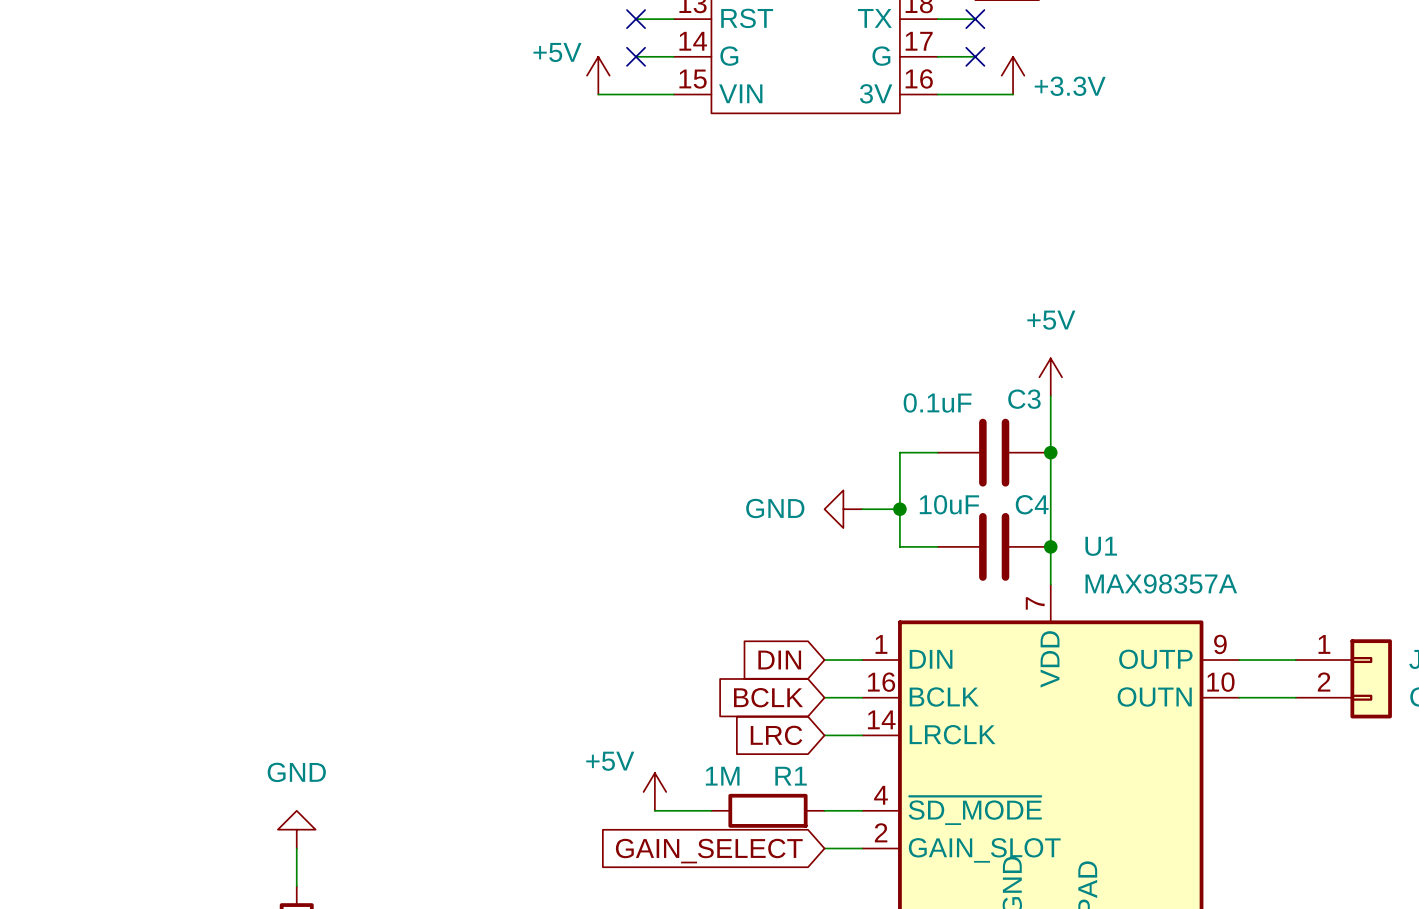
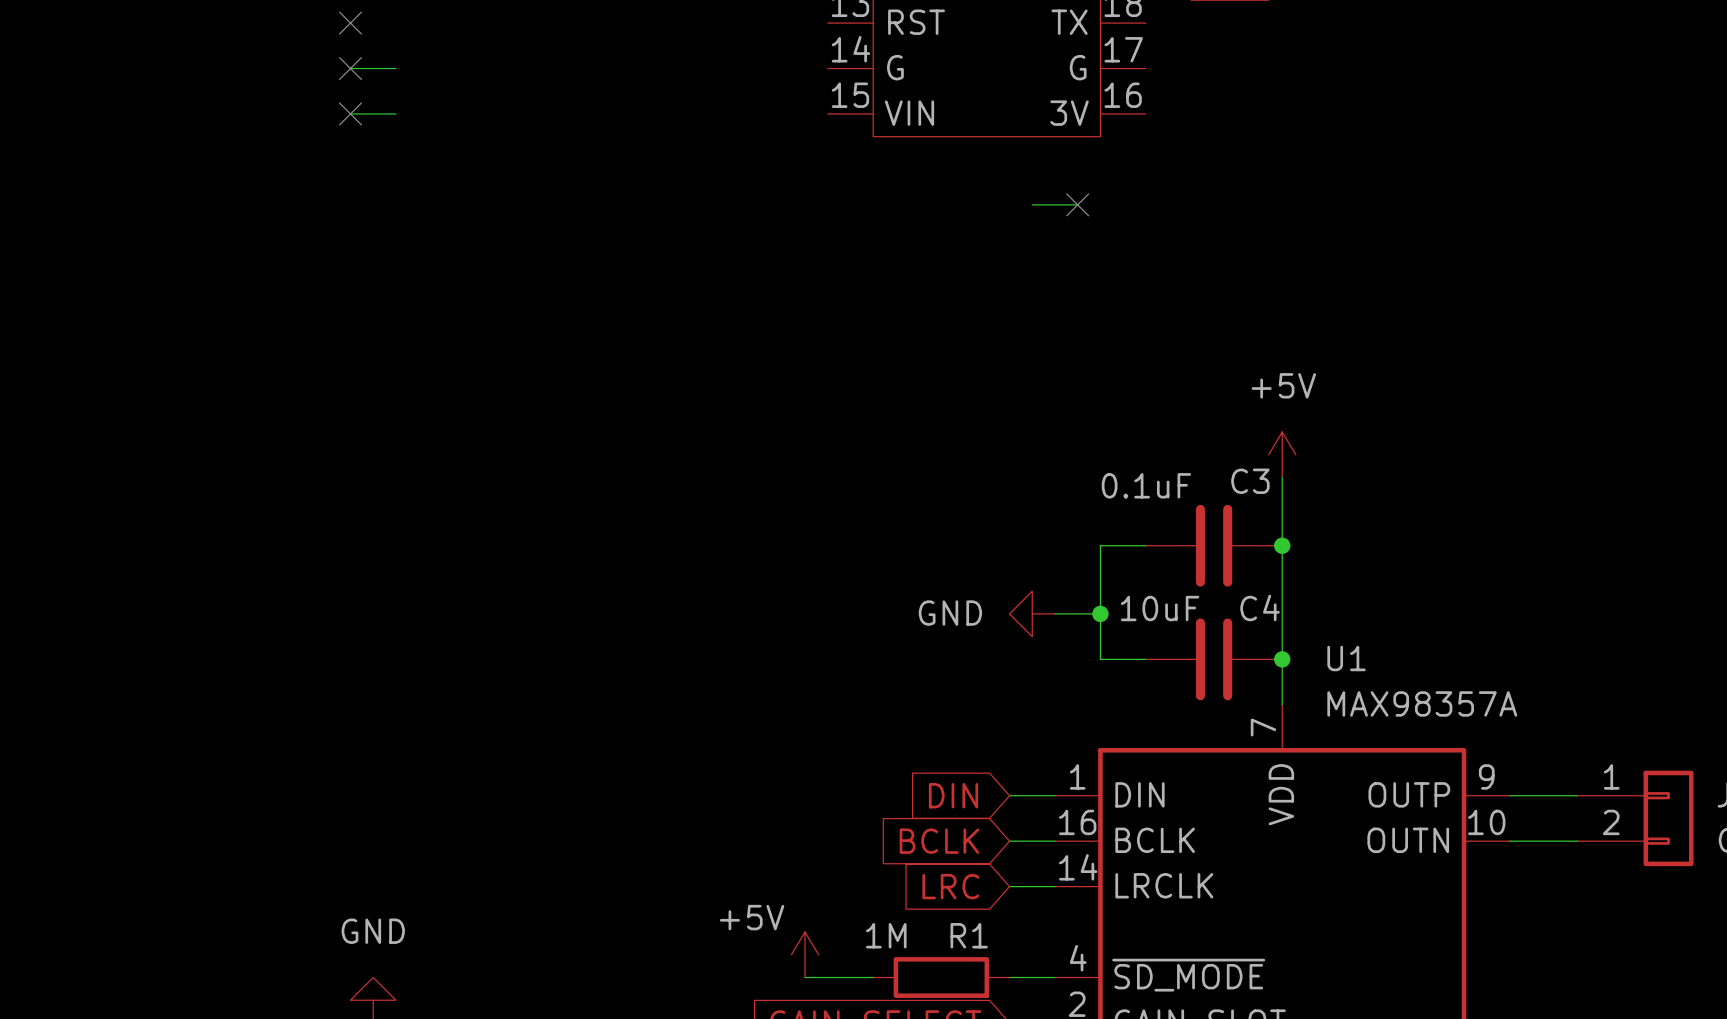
no-connect mark: none -> (350, 23)
wire: (636, 19) (673, 19) -> (350, 68) (395, 68)
no-connect mark: (636, 19) -> none
wire: (937, 19) (975, 19) -> none
no-connect mark: (975, 19) -> none
no-connect mark: none -> (350, 68)
wire: (636, 56) (673, 56) -> (350, 113) (395, 113)
no-connect mark: (636, 56) -> none
wire: (937, 56) (975, 56) -> (1032, 204) (1077, 204)
no-connect mark: (975, 56) -> none
power symbol: +5V (598, 75) -> none
power symbol: +3.3V (1013, 75) -> none
no-connect mark: none -> (350, 113)
wire: (598, 94) (673, 94) -> none
wire: (937, 94) (1013, 94) -> none
no-connect mark: none -> (1077, 204)

